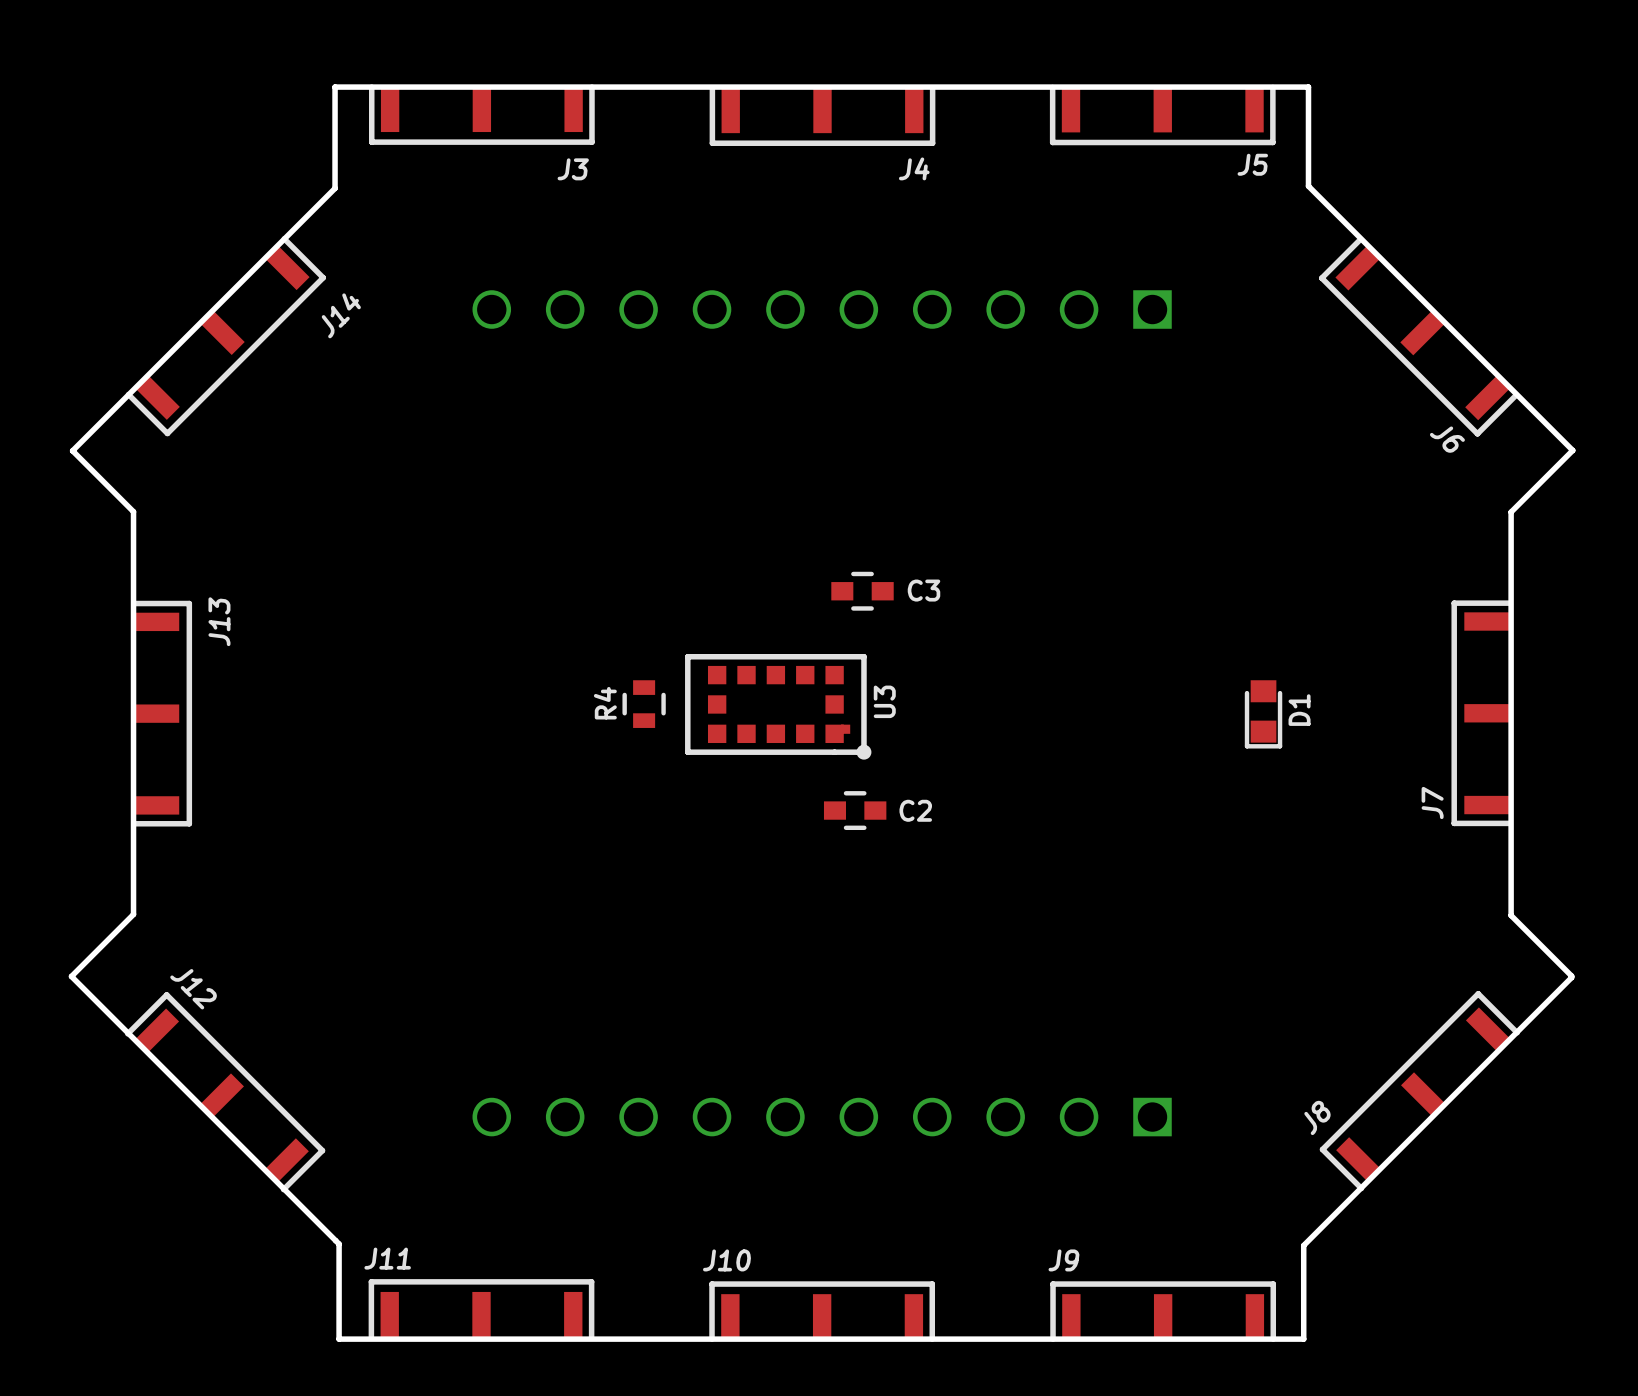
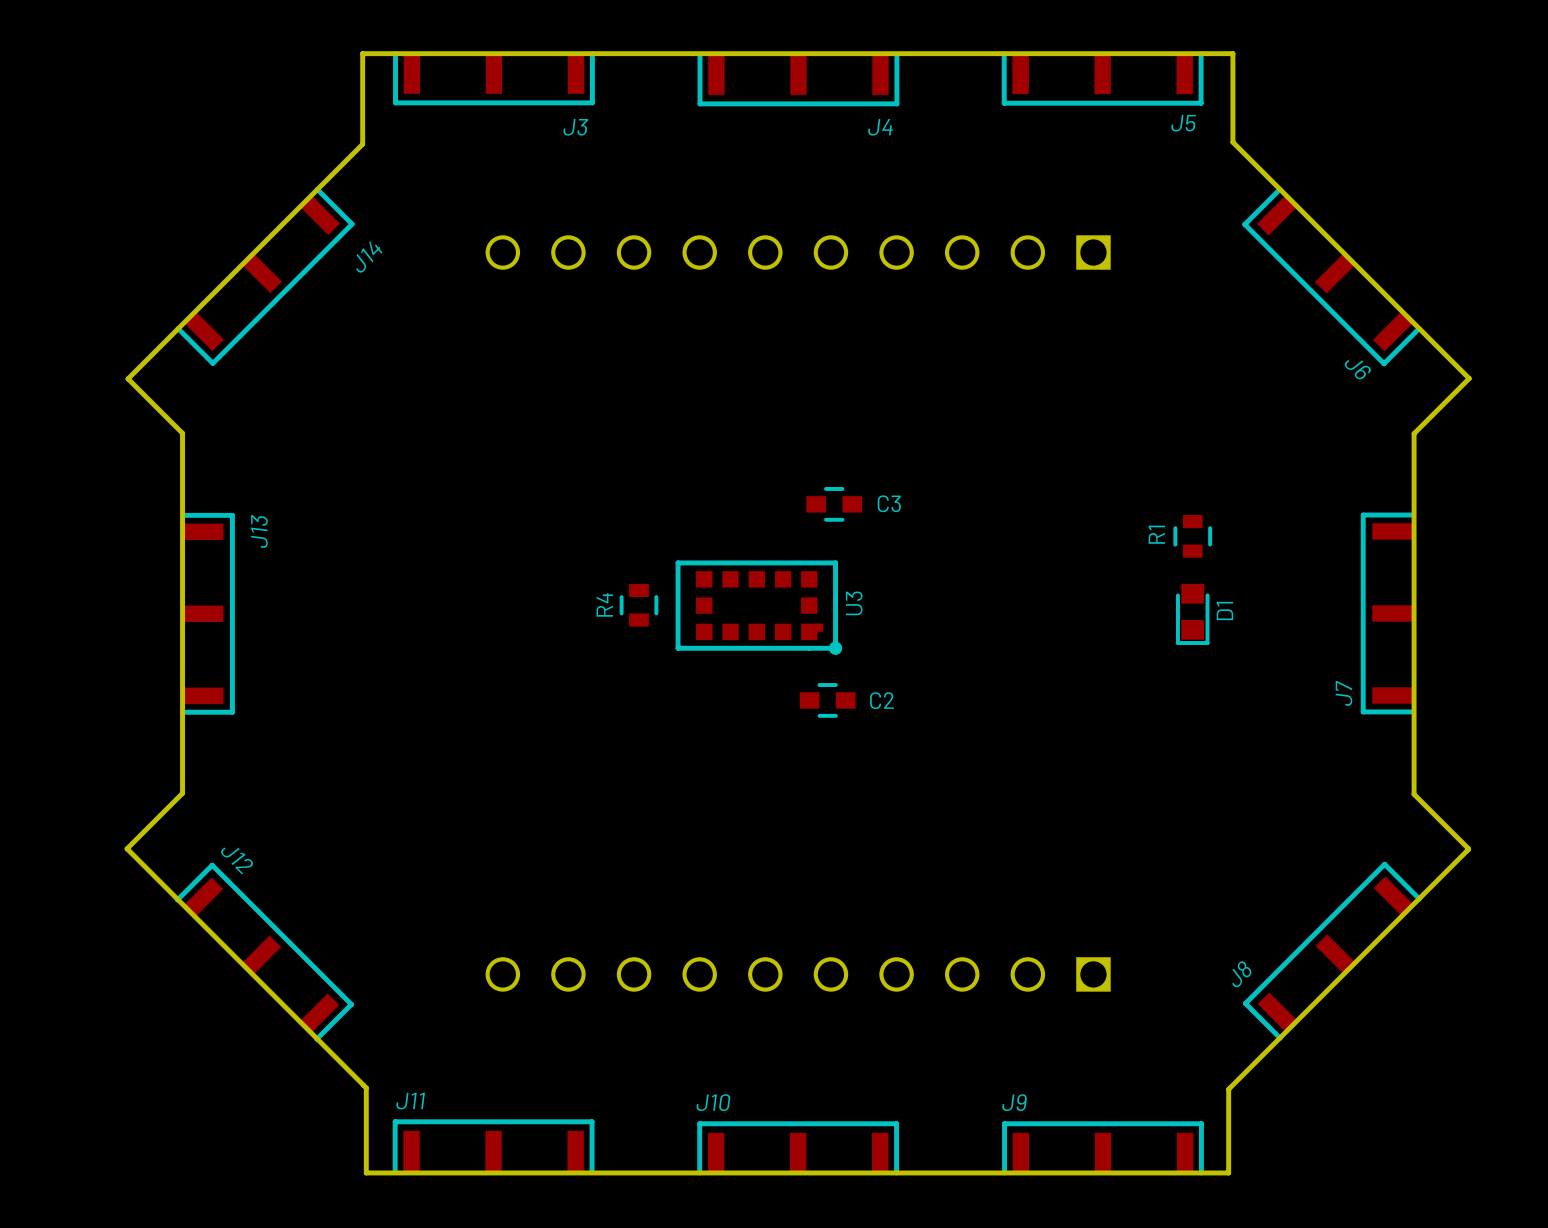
R1: none -> (1192, 536)

